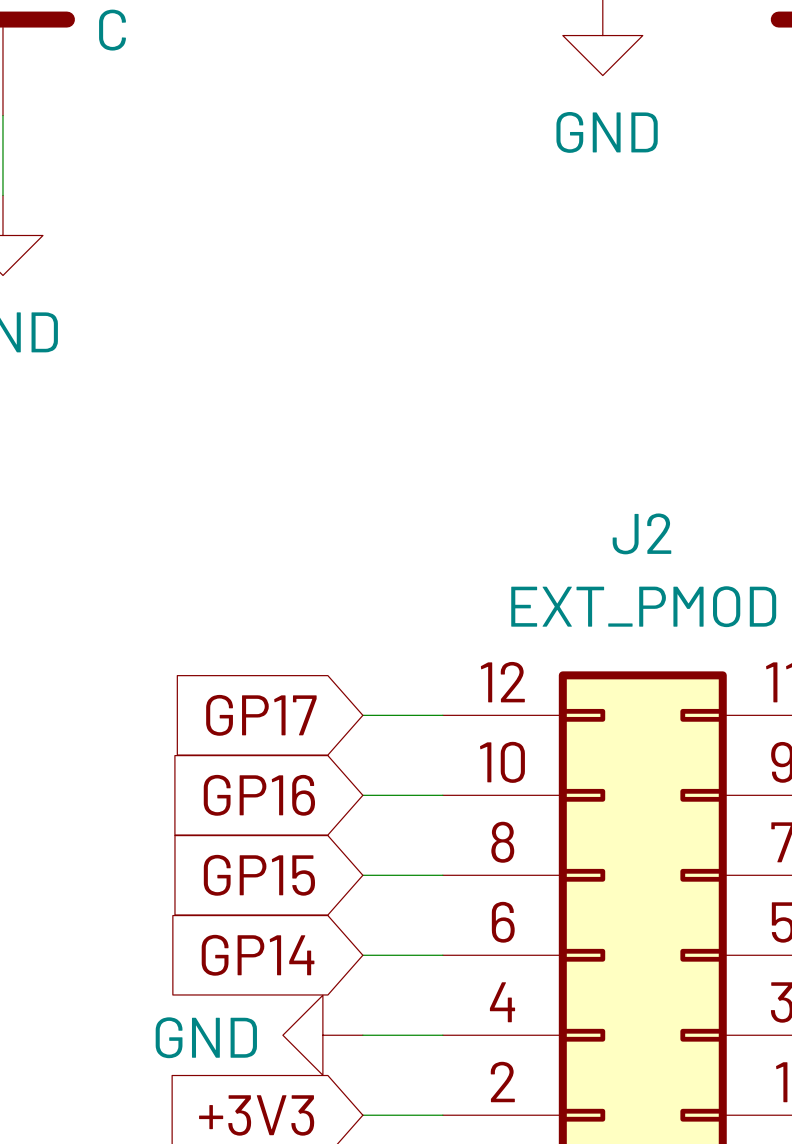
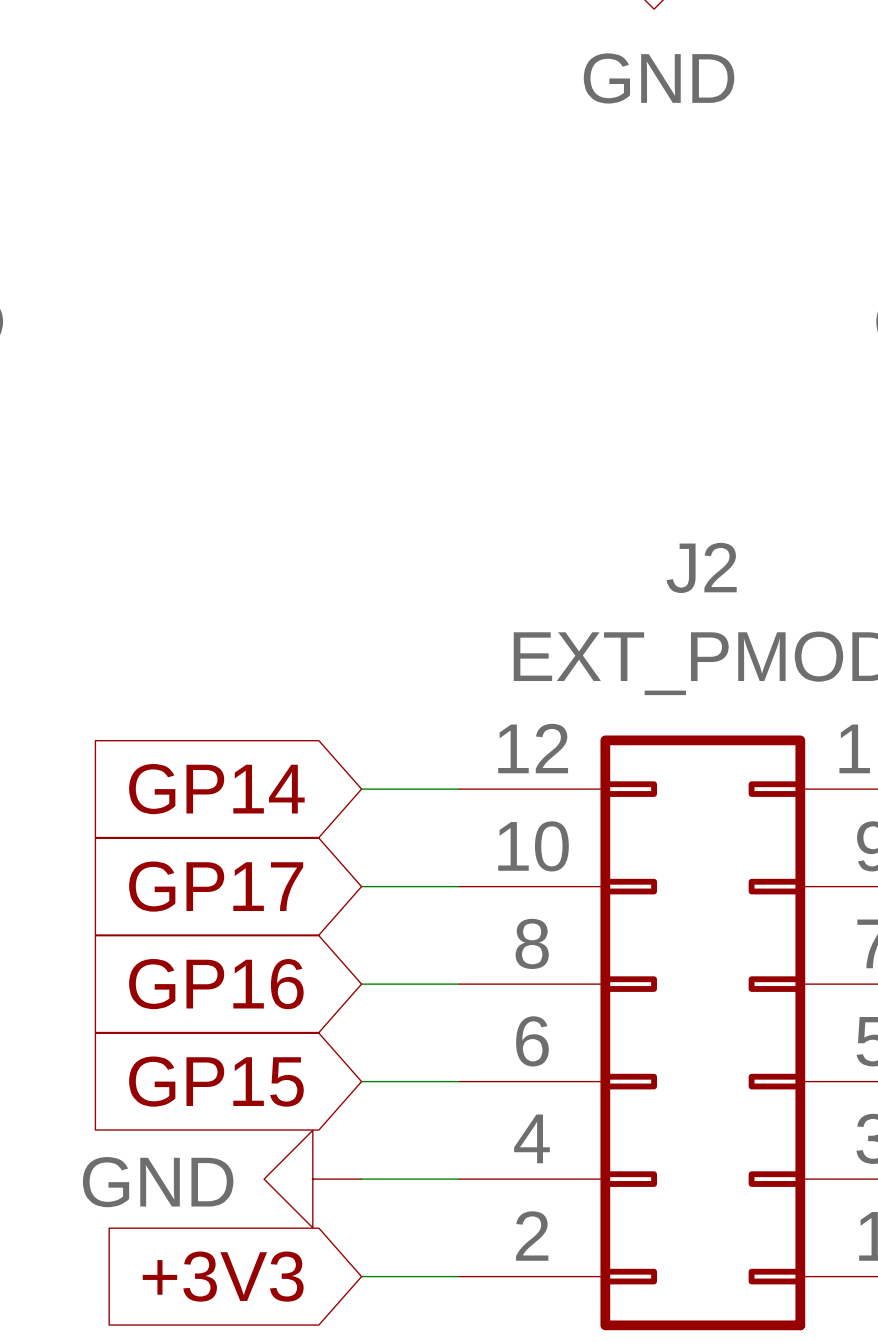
global label: GP17 (261, 715) -> GP14 (216, 789)
global label: GP16 (259, 795) -> GP17 (216, 886)
global label: GP15 (259, 875) -> GP16 (216, 984)
global label: GP14 (258, 955) -> GP15 (216, 1081)

